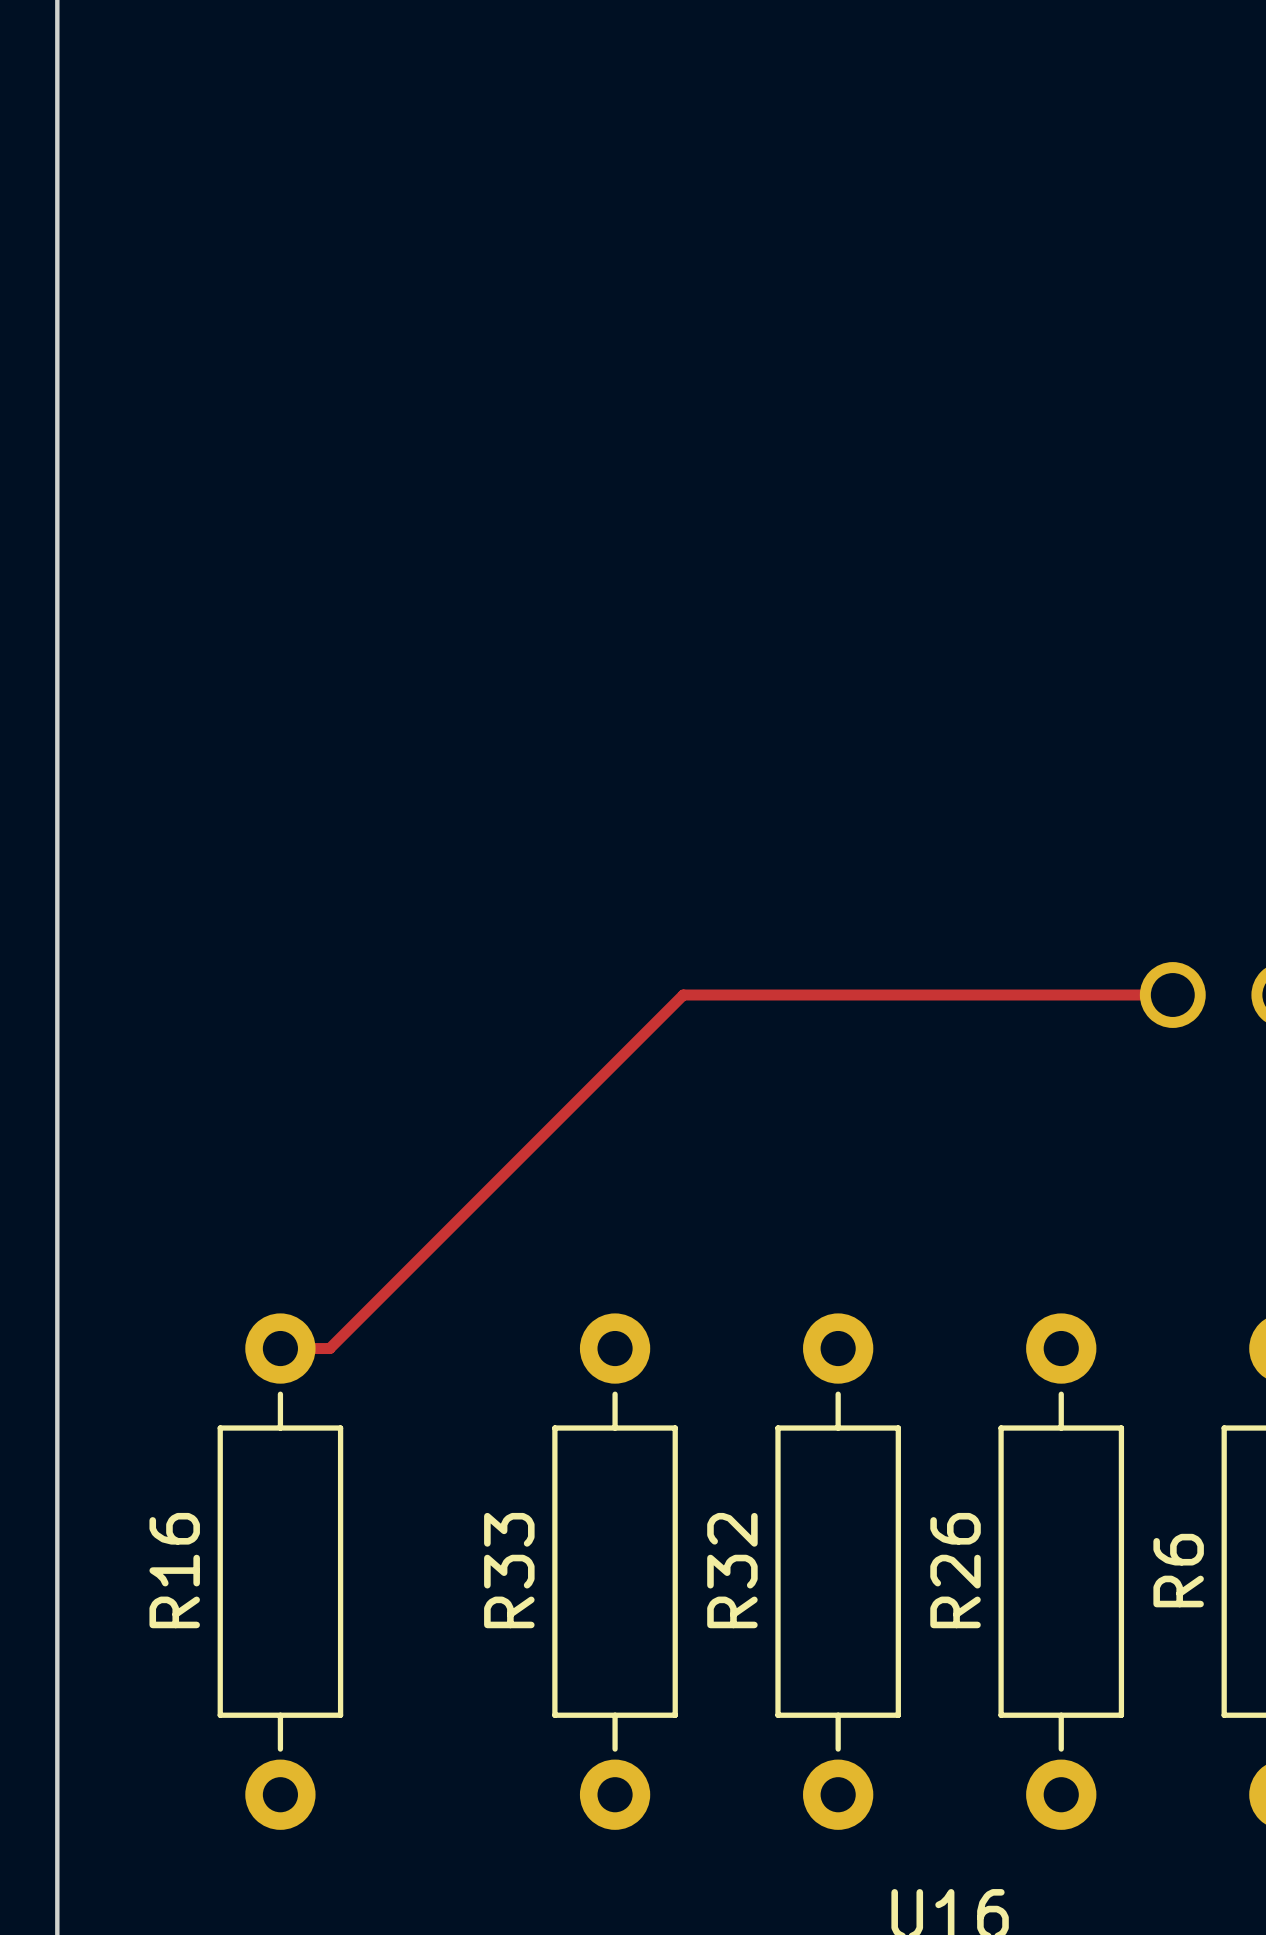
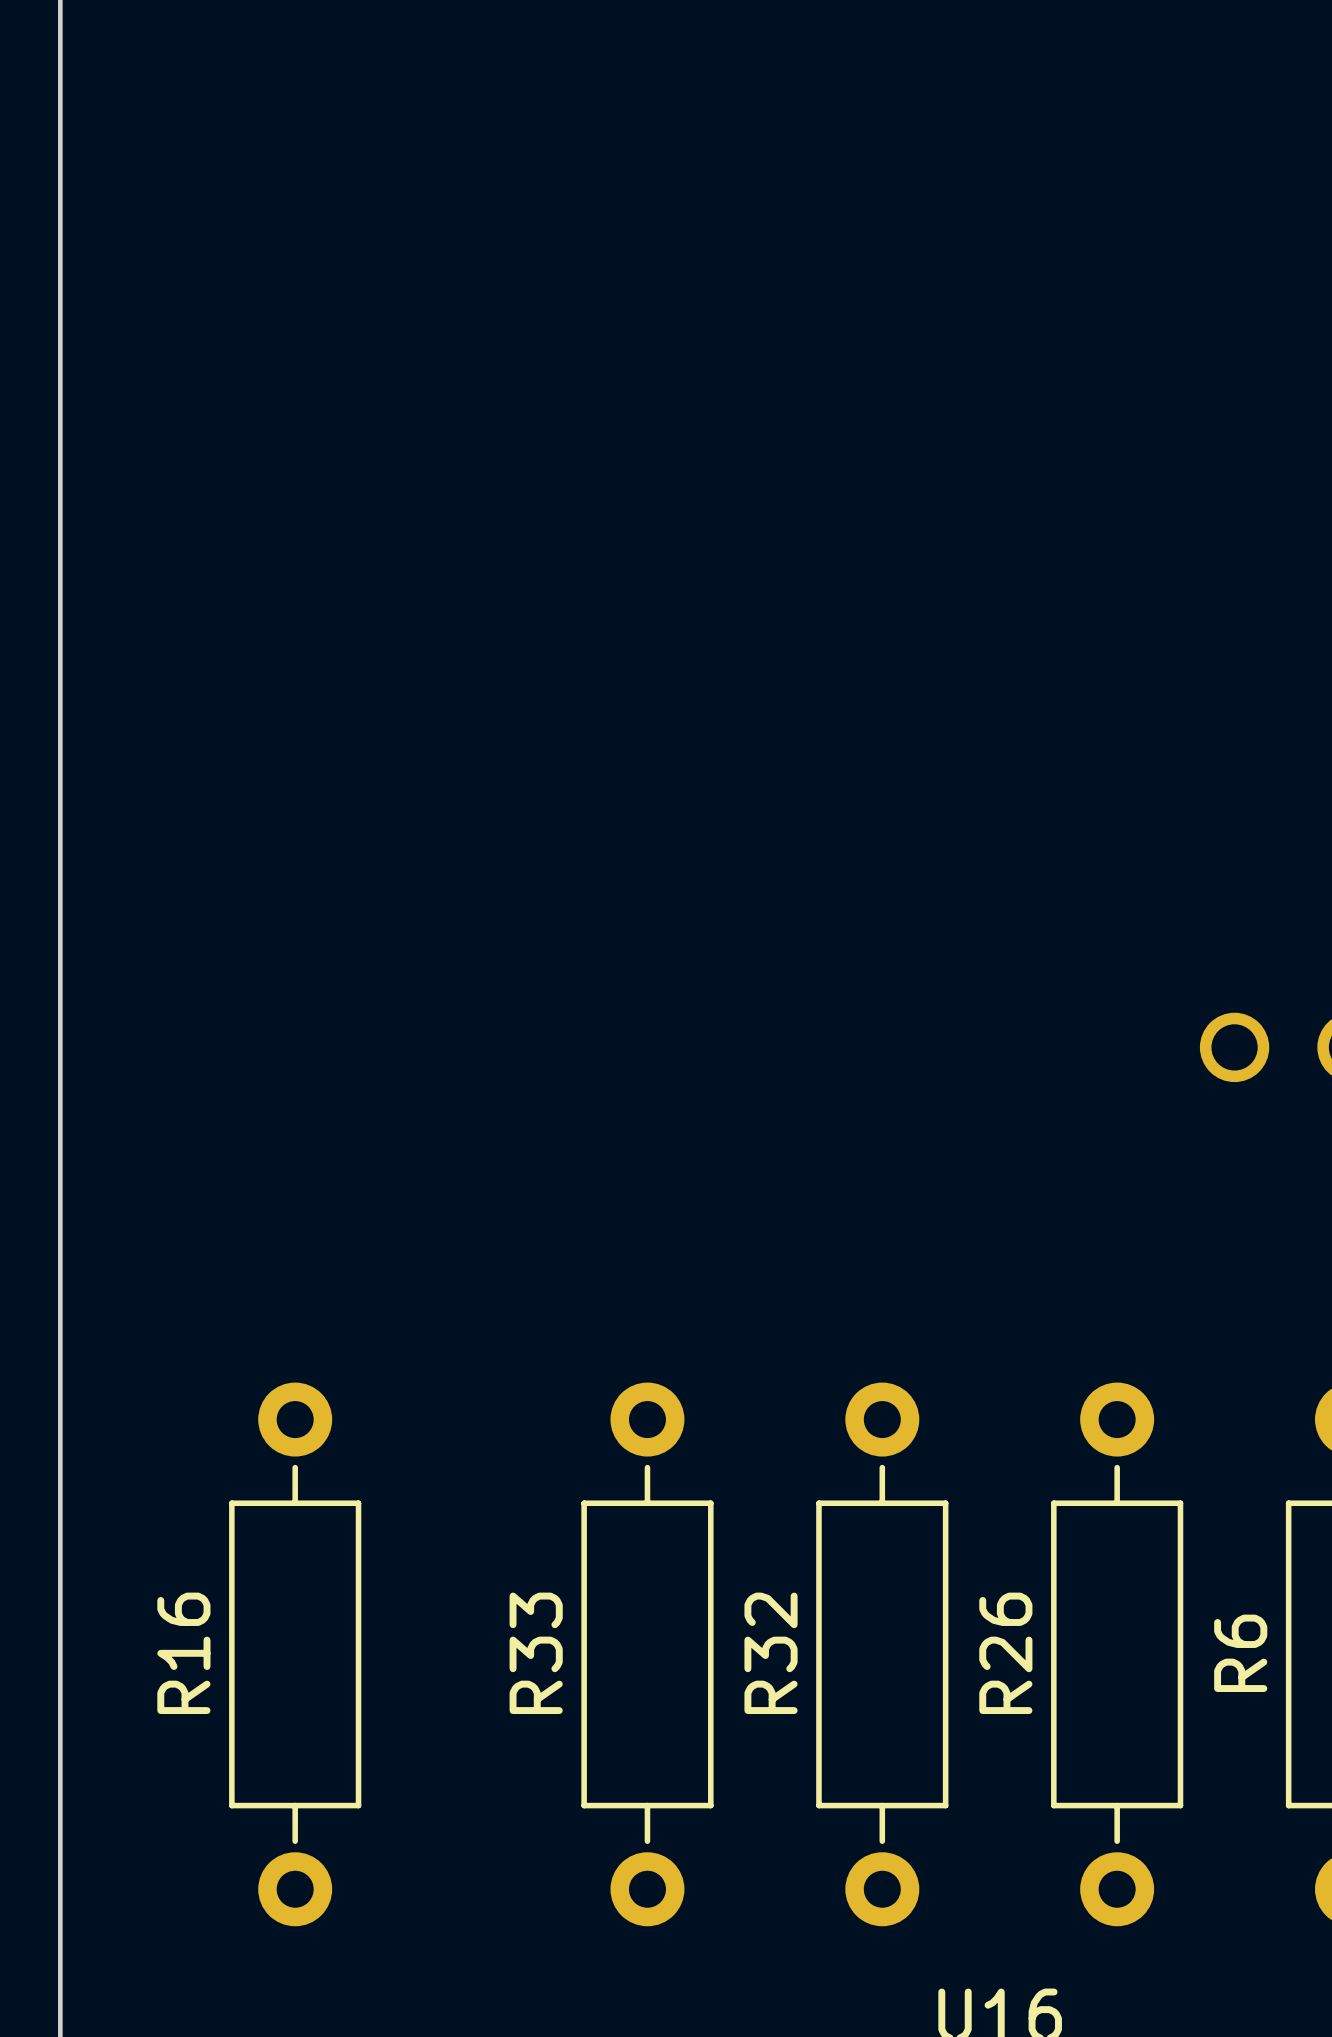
track: (1172, 995) (683, 995) (329, 1348) (280, 1348) -> none

